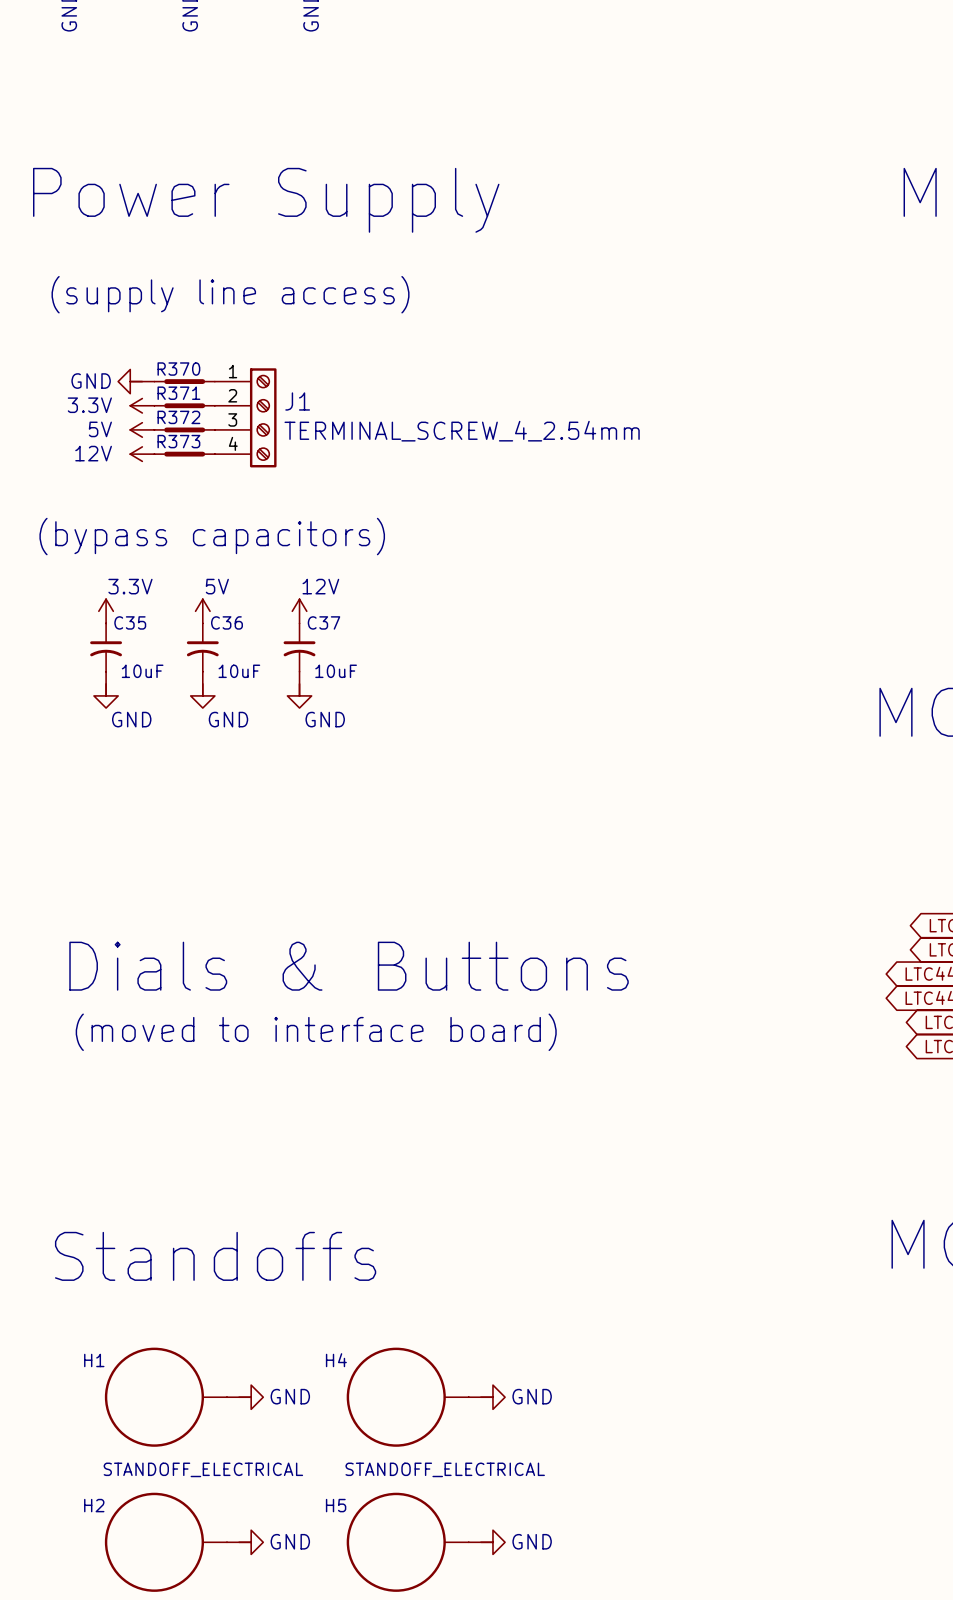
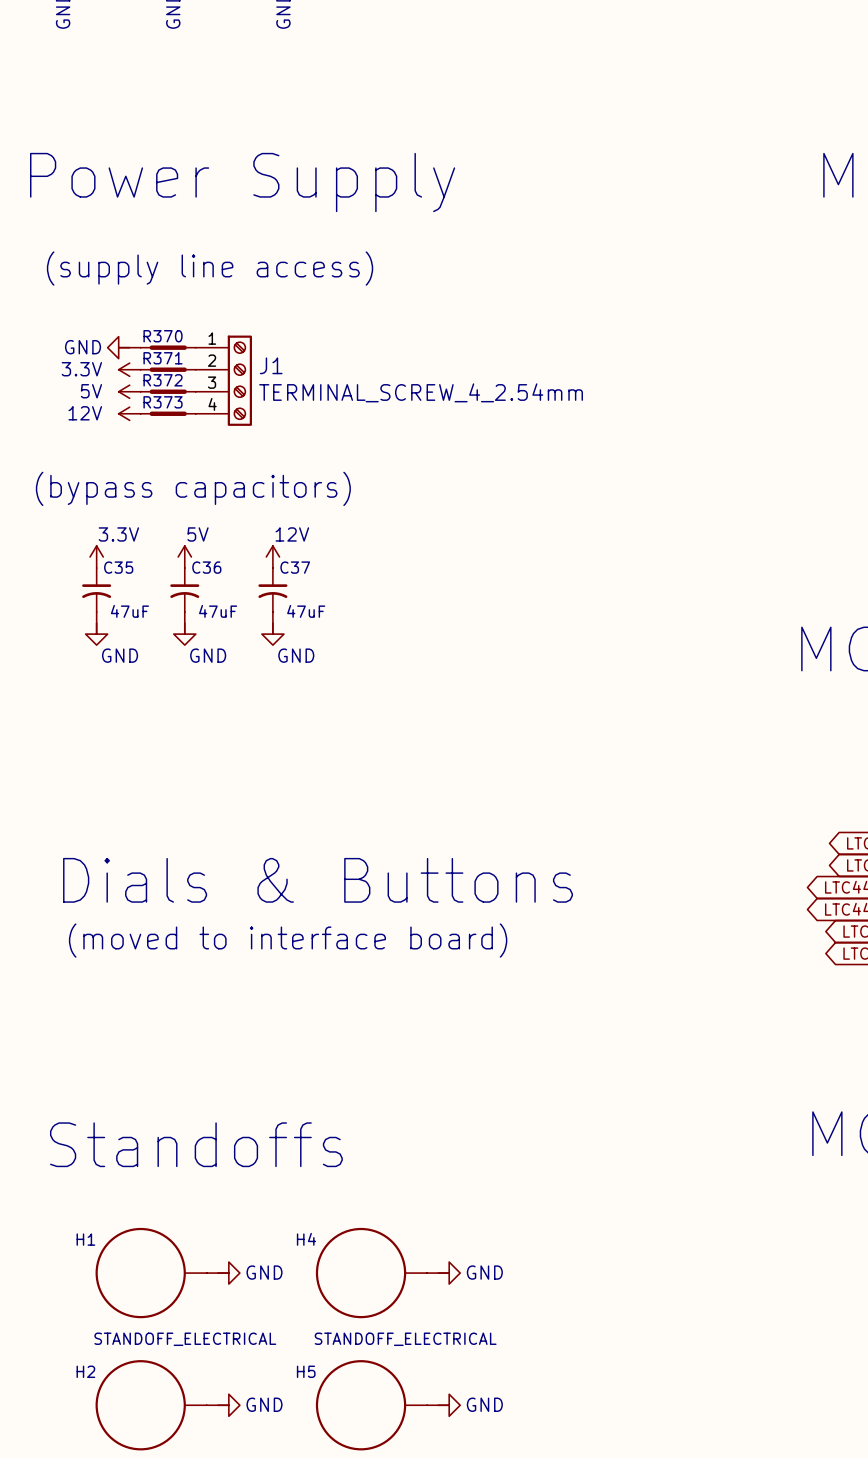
C35 text: 10uF (142, 671) -> 47uF (129, 611)
C36 text: 10uF (239, 671) -> 47uF (218, 611)
C37 text: 10uF (336, 671) -> 47uF (306, 611)

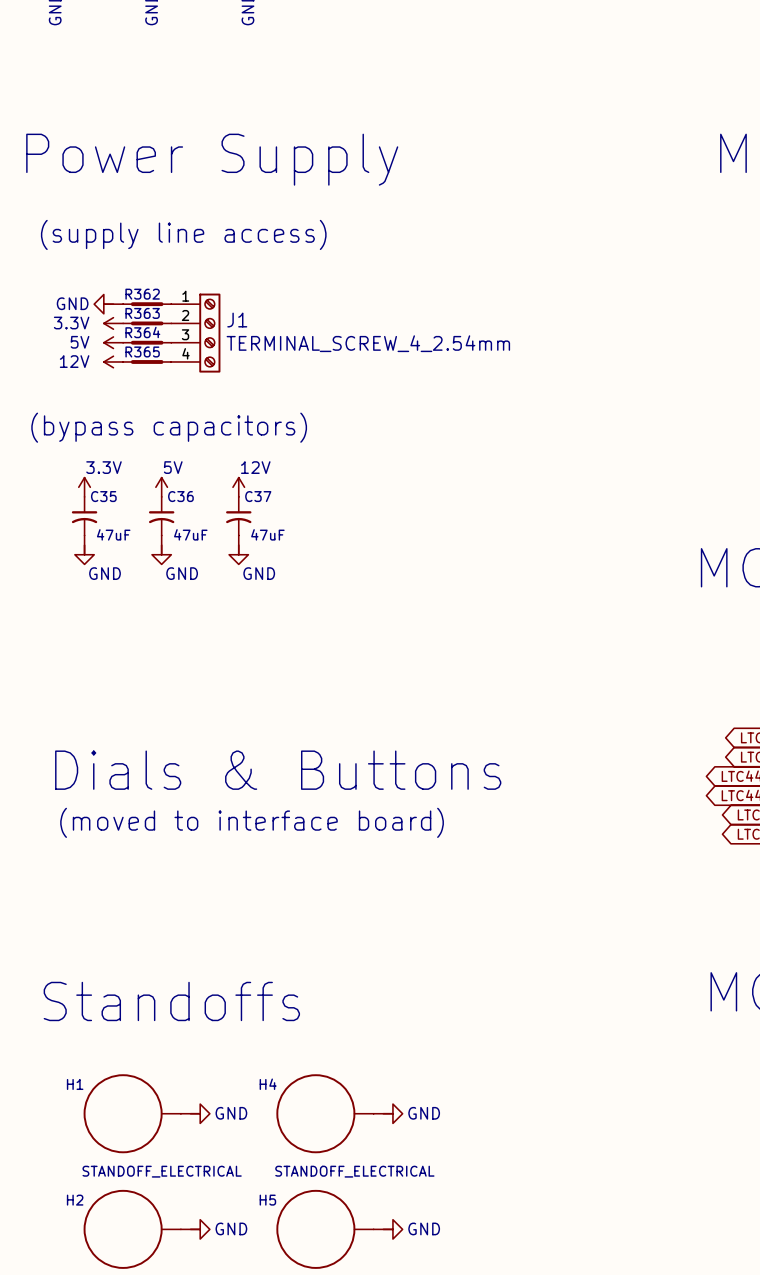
R370 name: R370 (163, 336) -> R362 (142, 294)
R371 name: R371 (163, 358) -> R363 (142, 313)
R372 name: R372 (163, 380) -> R364 (142, 332)
R373 name: R373 (163, 402) -> R365 (142, 351)

